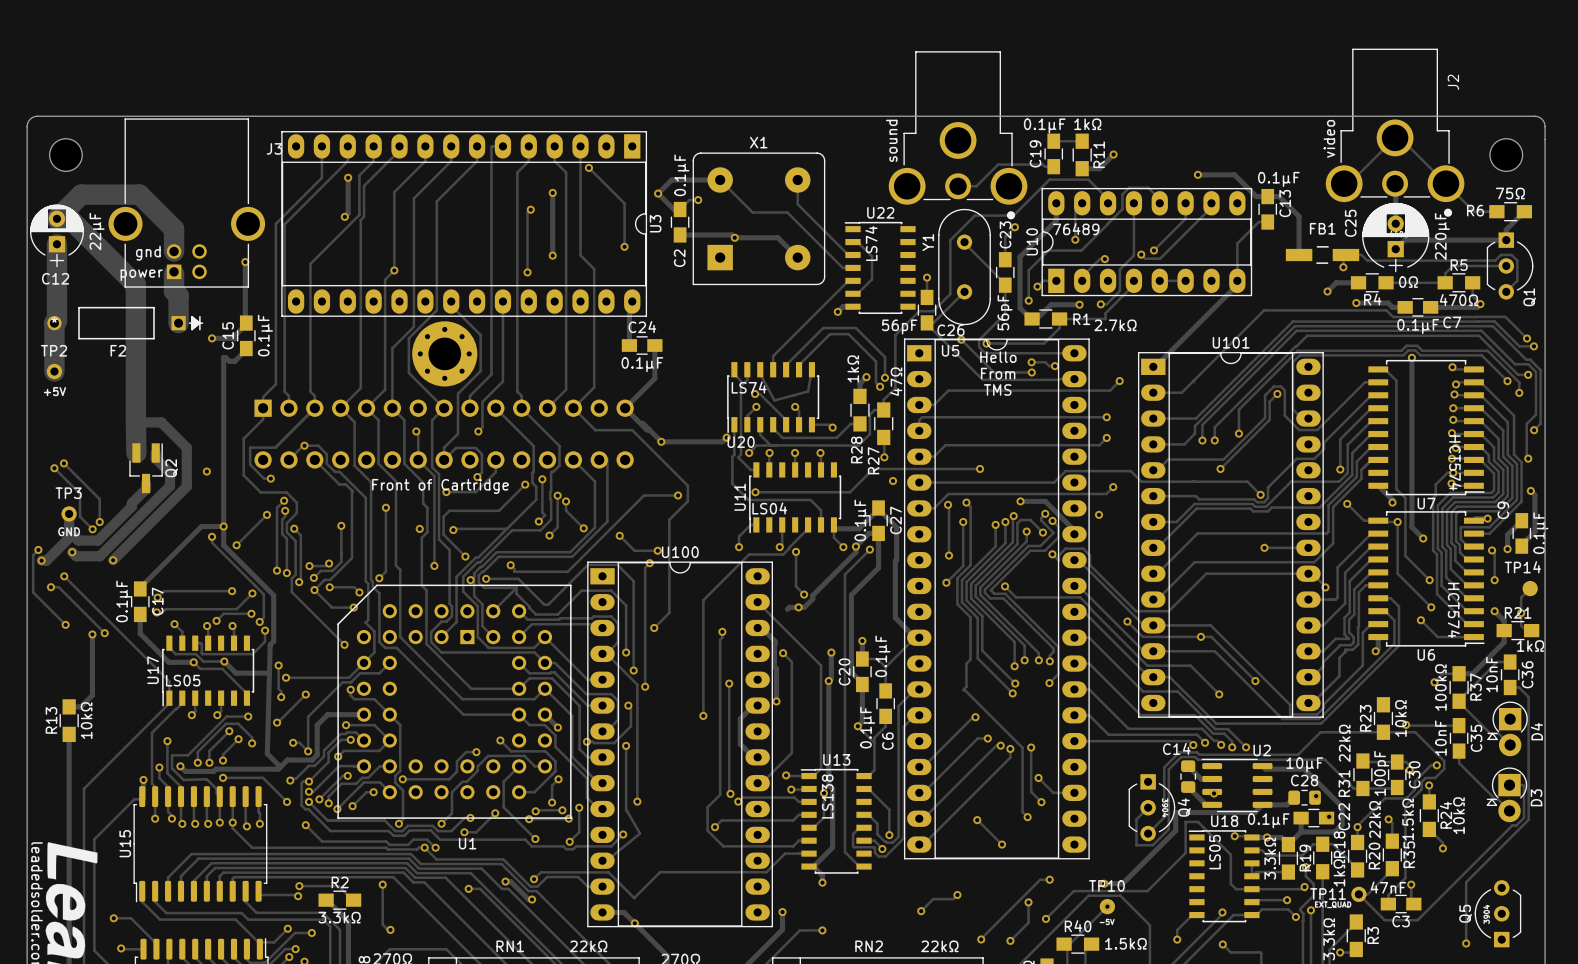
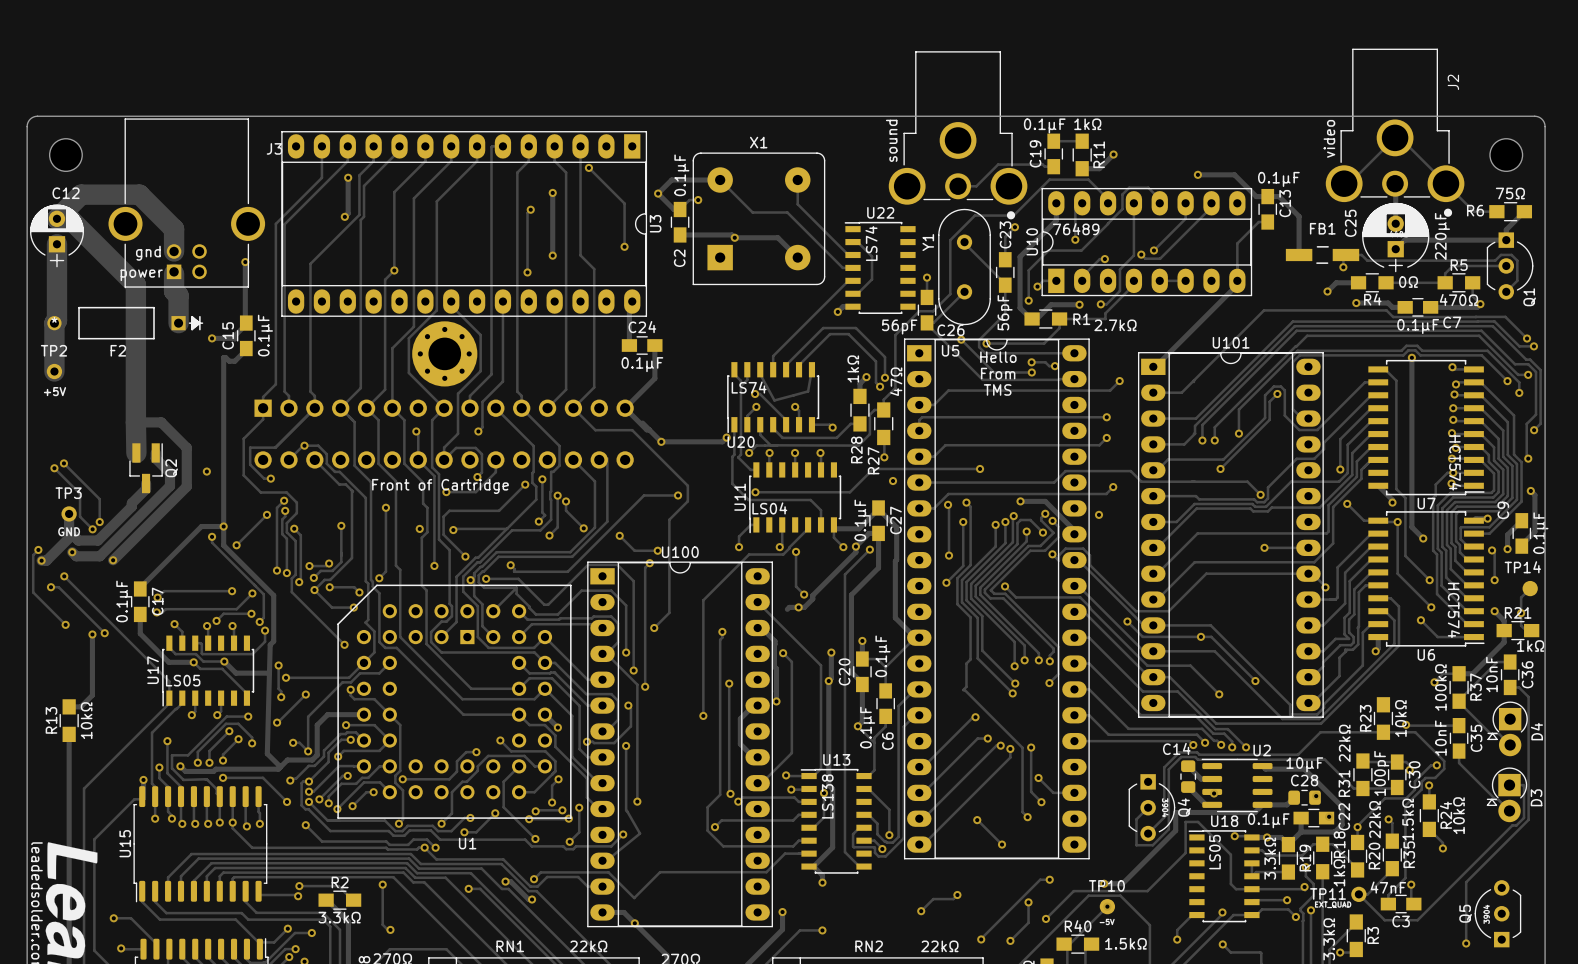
C12 value: 22µF (97, 231) -> none
C12 name position: C12 (55, 278) -> C12 (66, 193)

